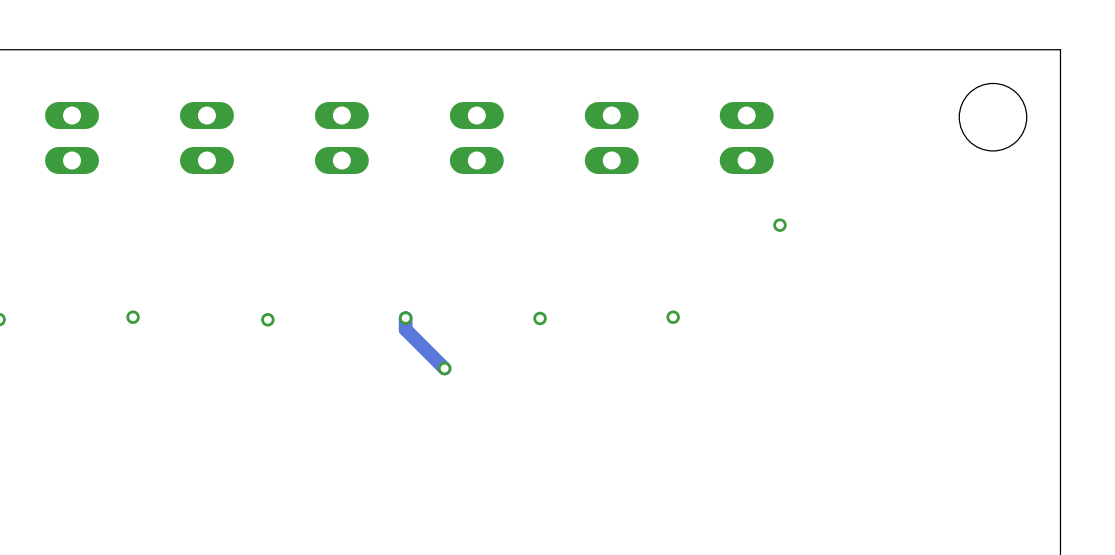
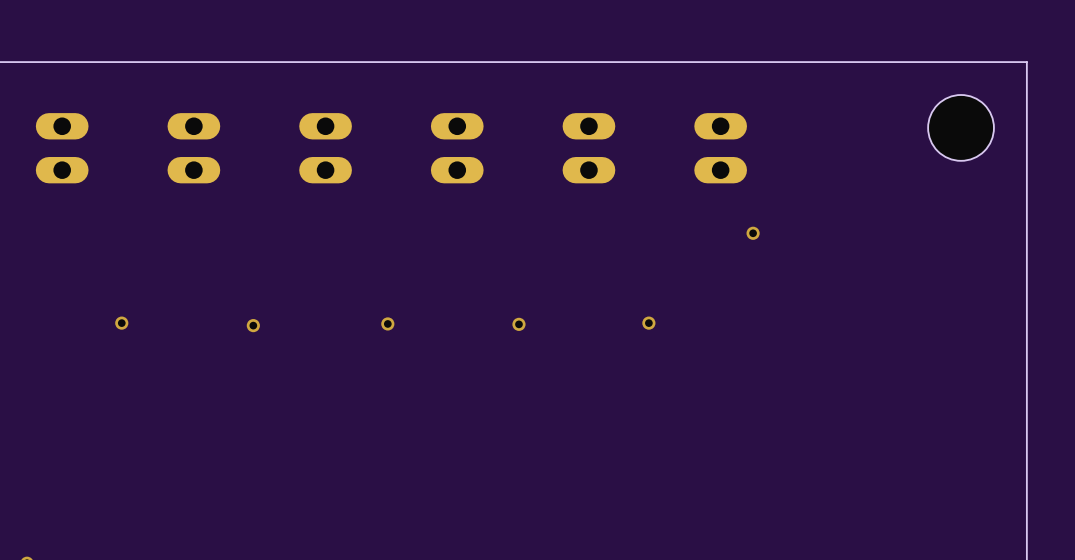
track: (405, 318) (405, 329) (444, 368) -> none
via: (444, 368) -> none

